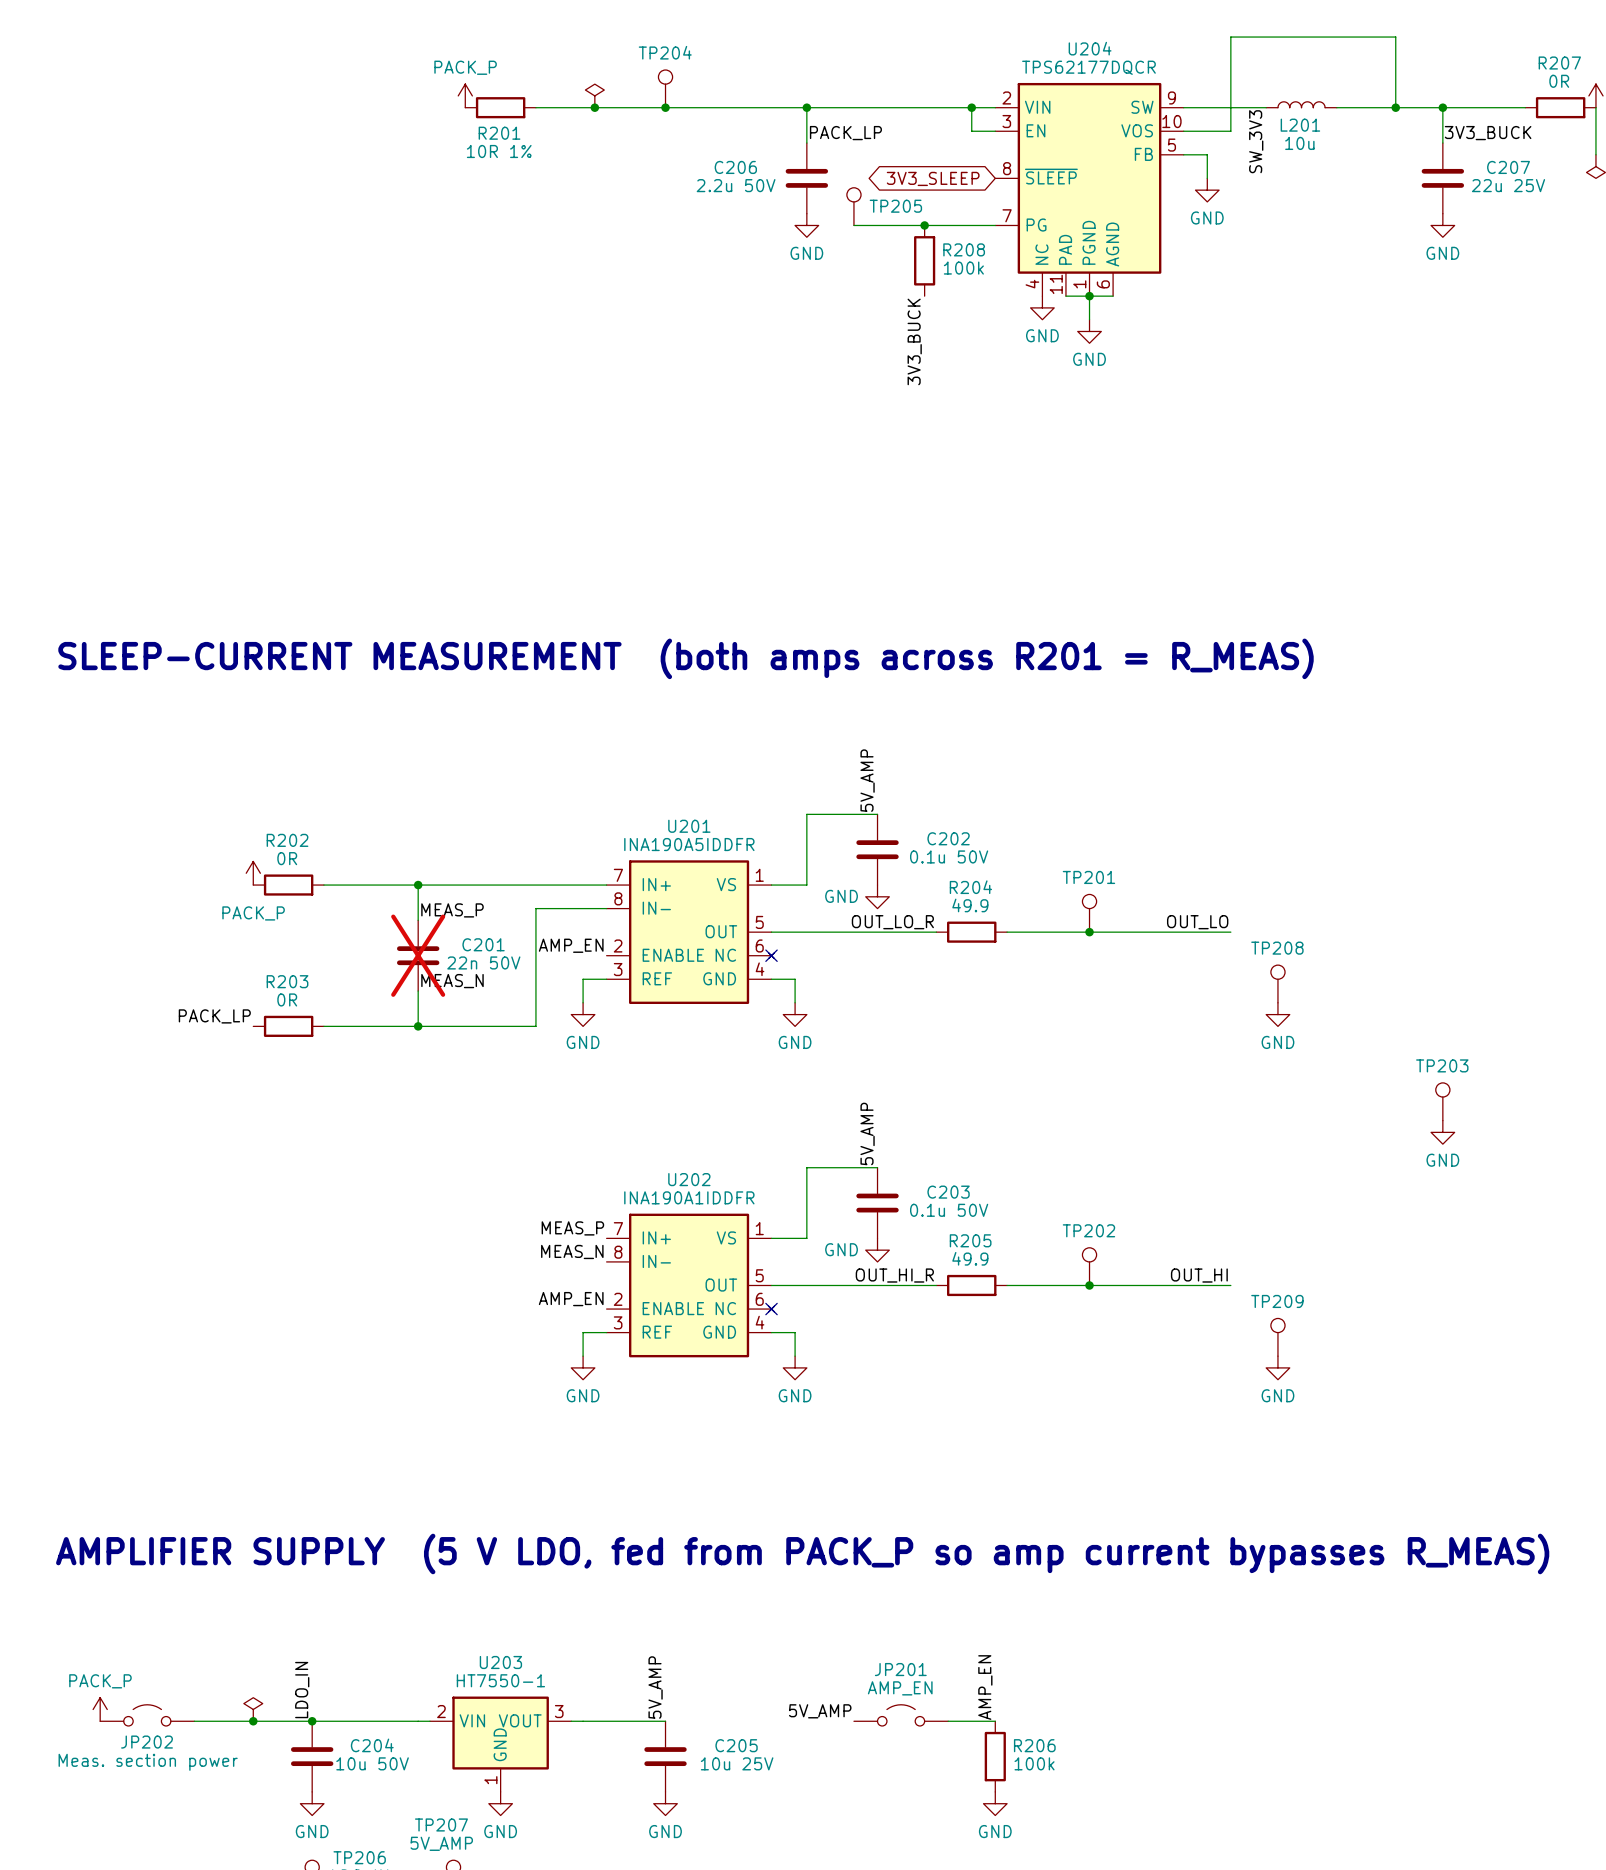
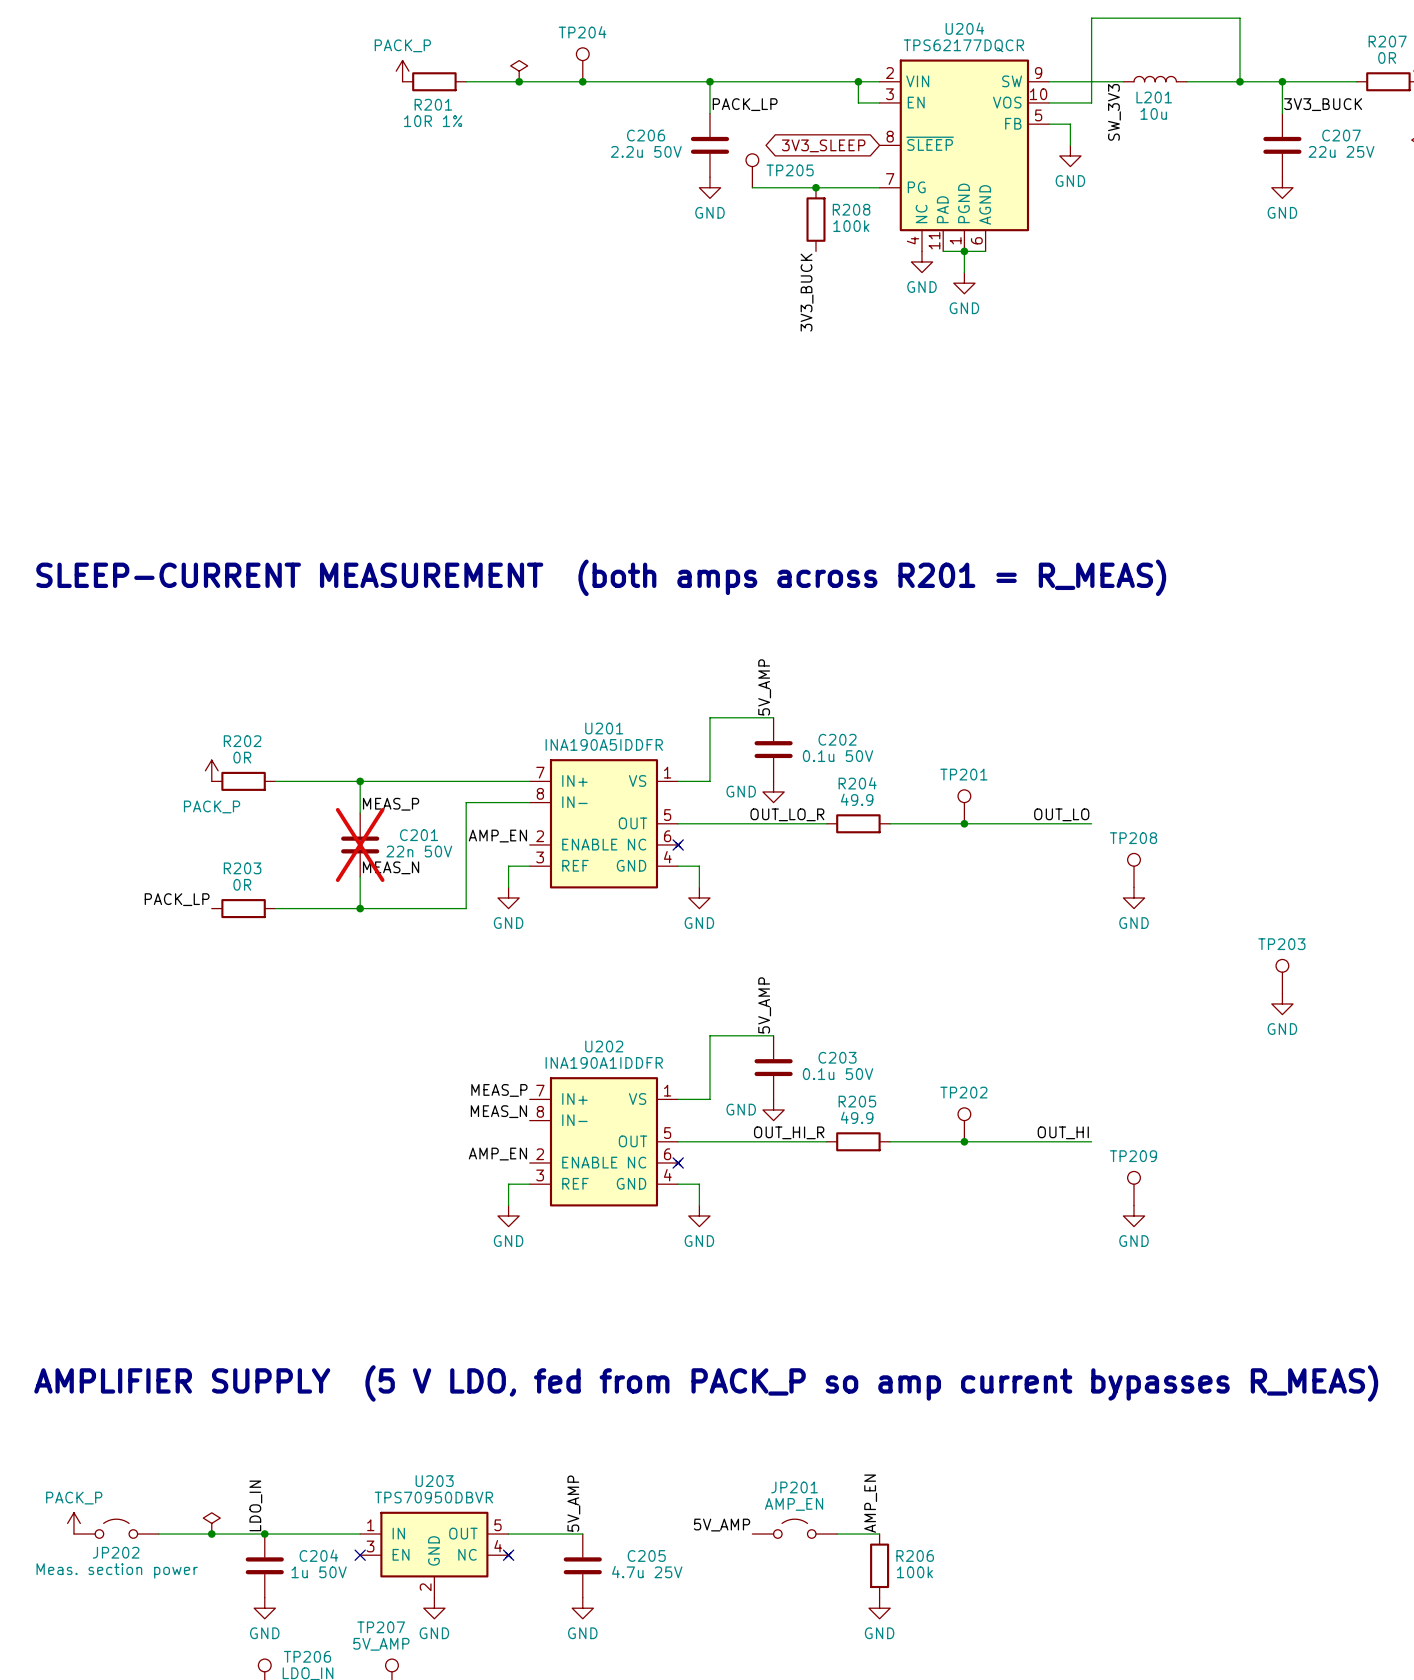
U203 value: HT7550-1 (500, 1680) -> TPS70950DBVR (433, 1497)
U203 symbol: [429, 1696, 572, 1792] -> [360, 1511, 512, 1598]
no-connect mark: none -> (360, 1555)
no-connect mark: none -> (508, 1555)
C204 value: 10u 50V (372, 1763) -> 1u 50V (319, 1572)
C205 value: 10u 25V (737, 1763) -> 4.7u 25V (647, 1572)

